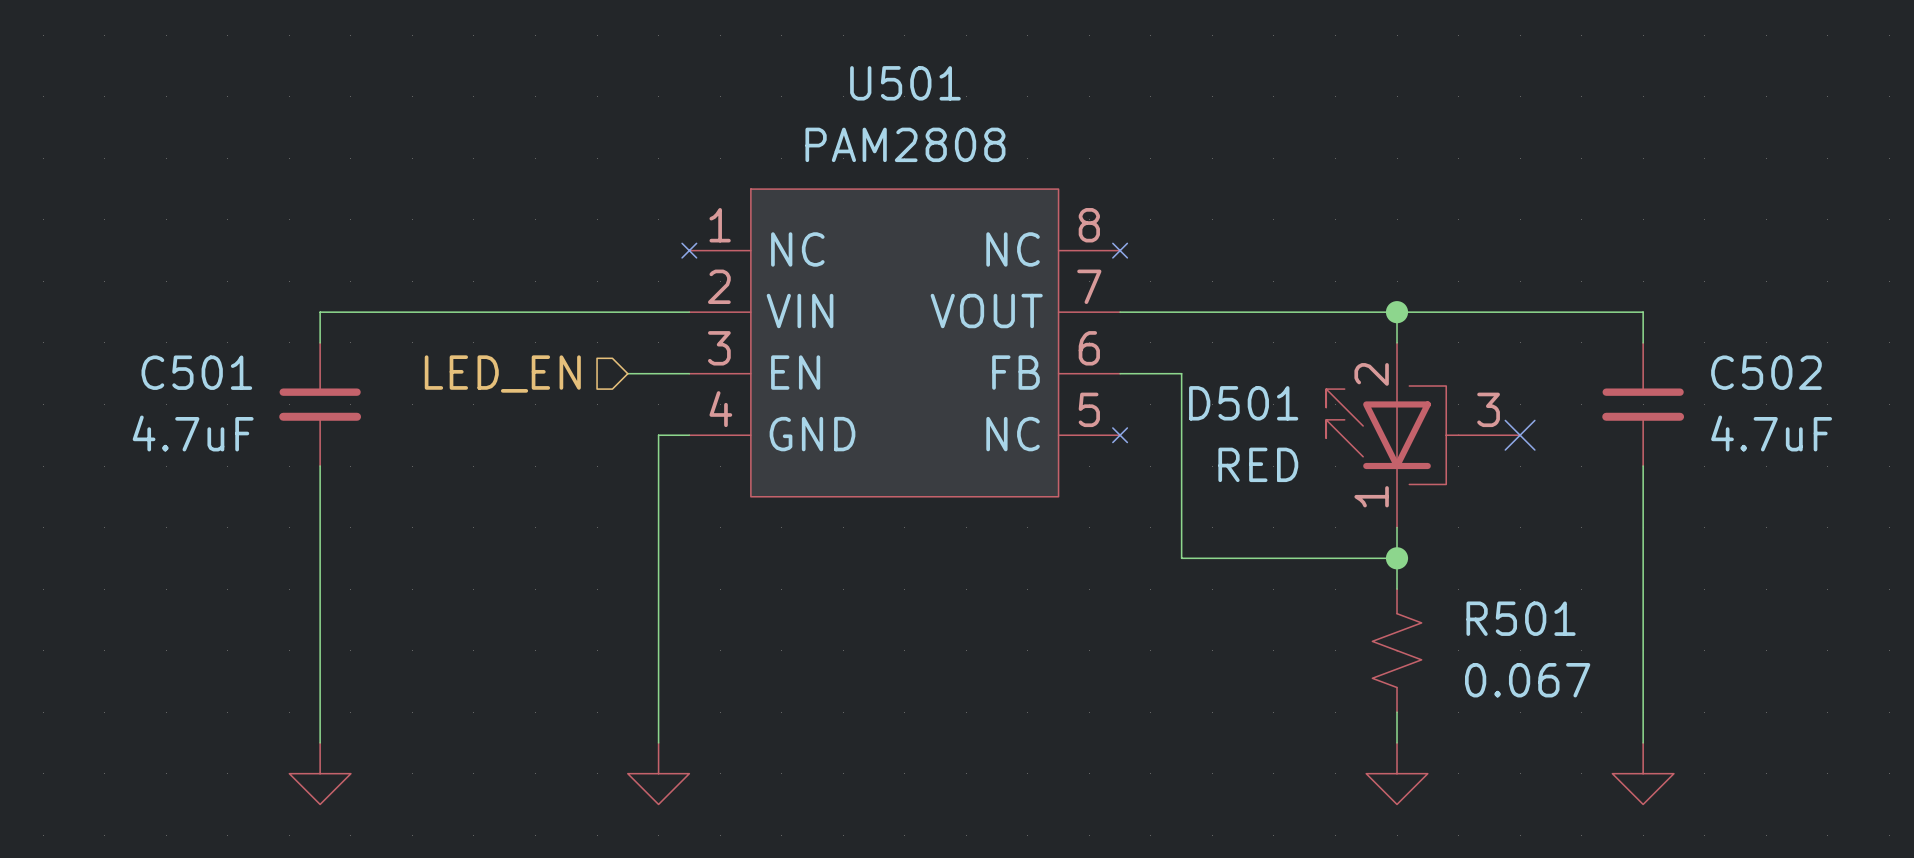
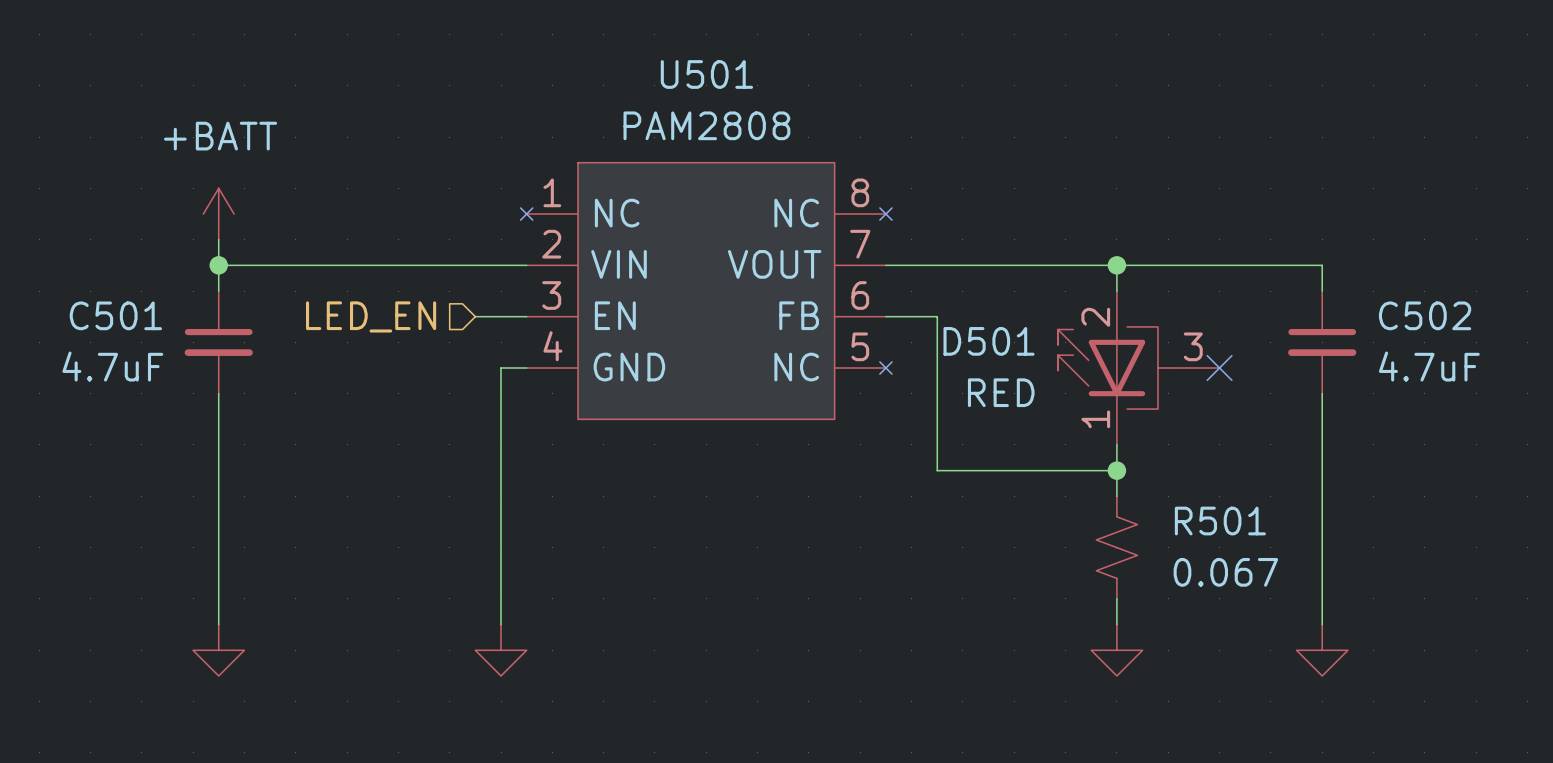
power symbol: none -> +BATT (218, 214)
wire: none -> (218, 239) (218, 265)
junction: none -> (218, 265)

